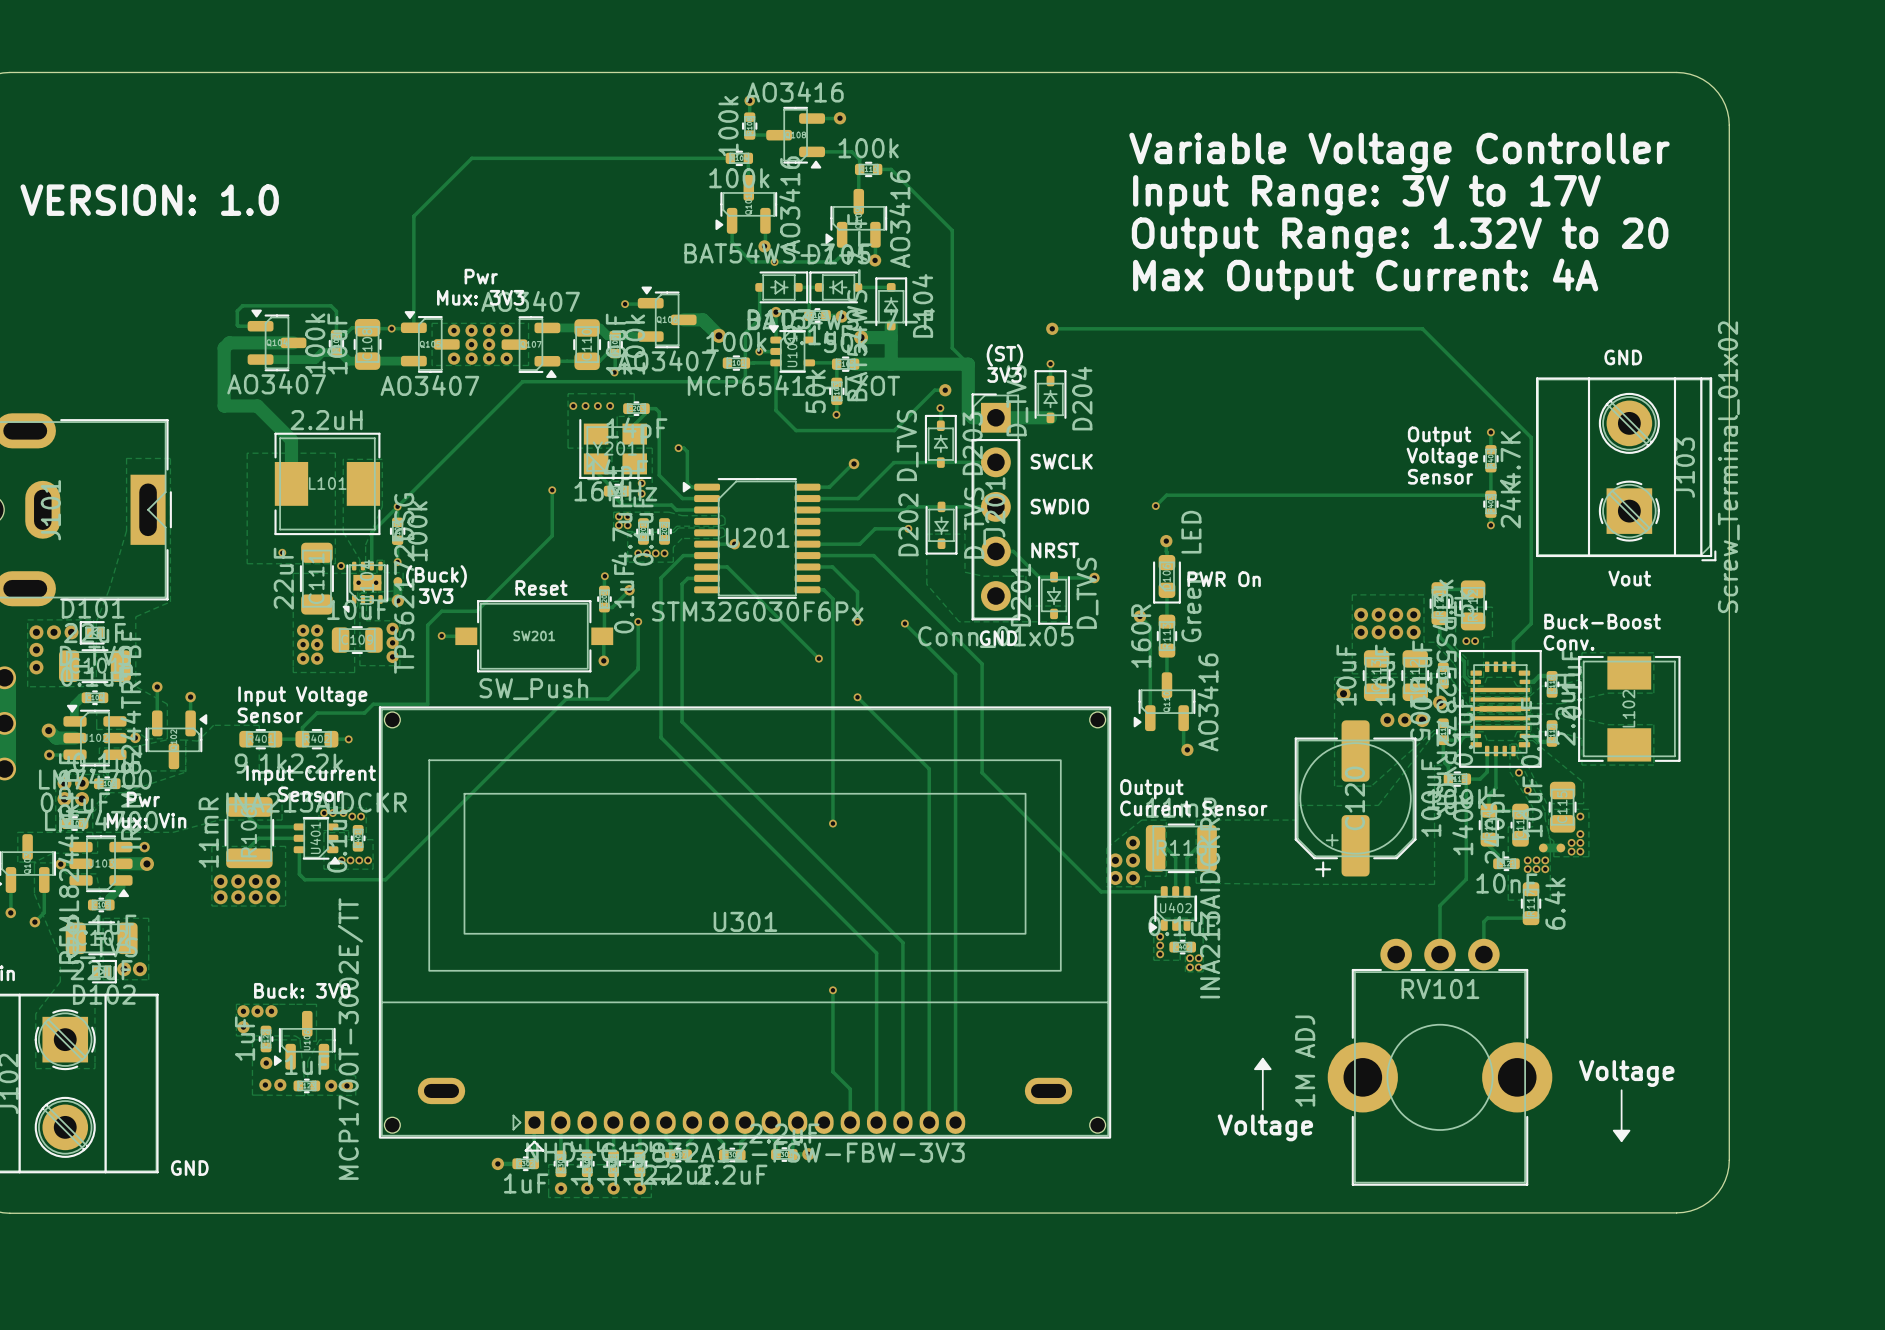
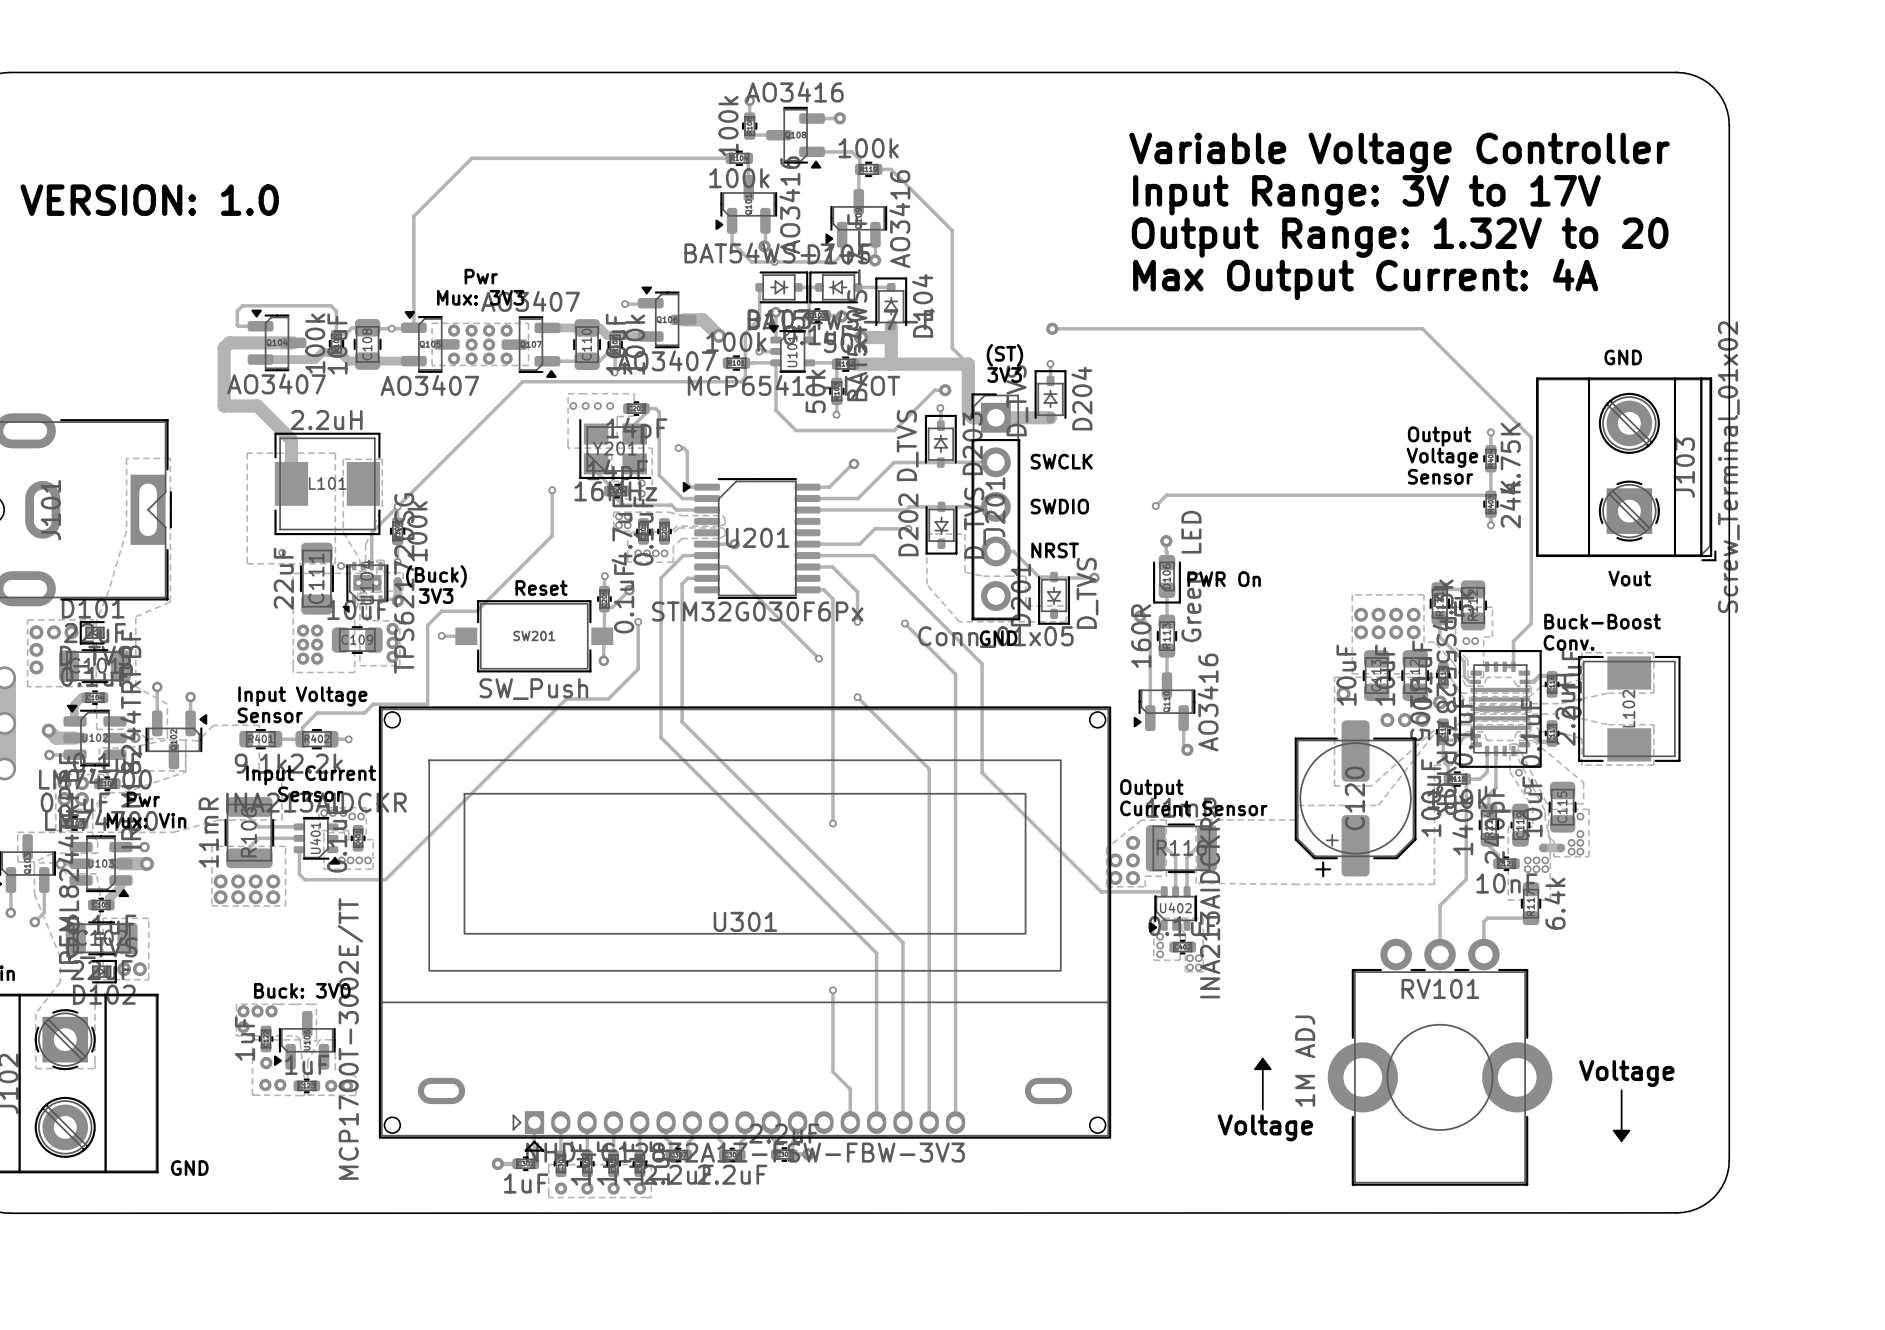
part value: 4.7K (1510, 458) -> 4.75K (1510, 458)

